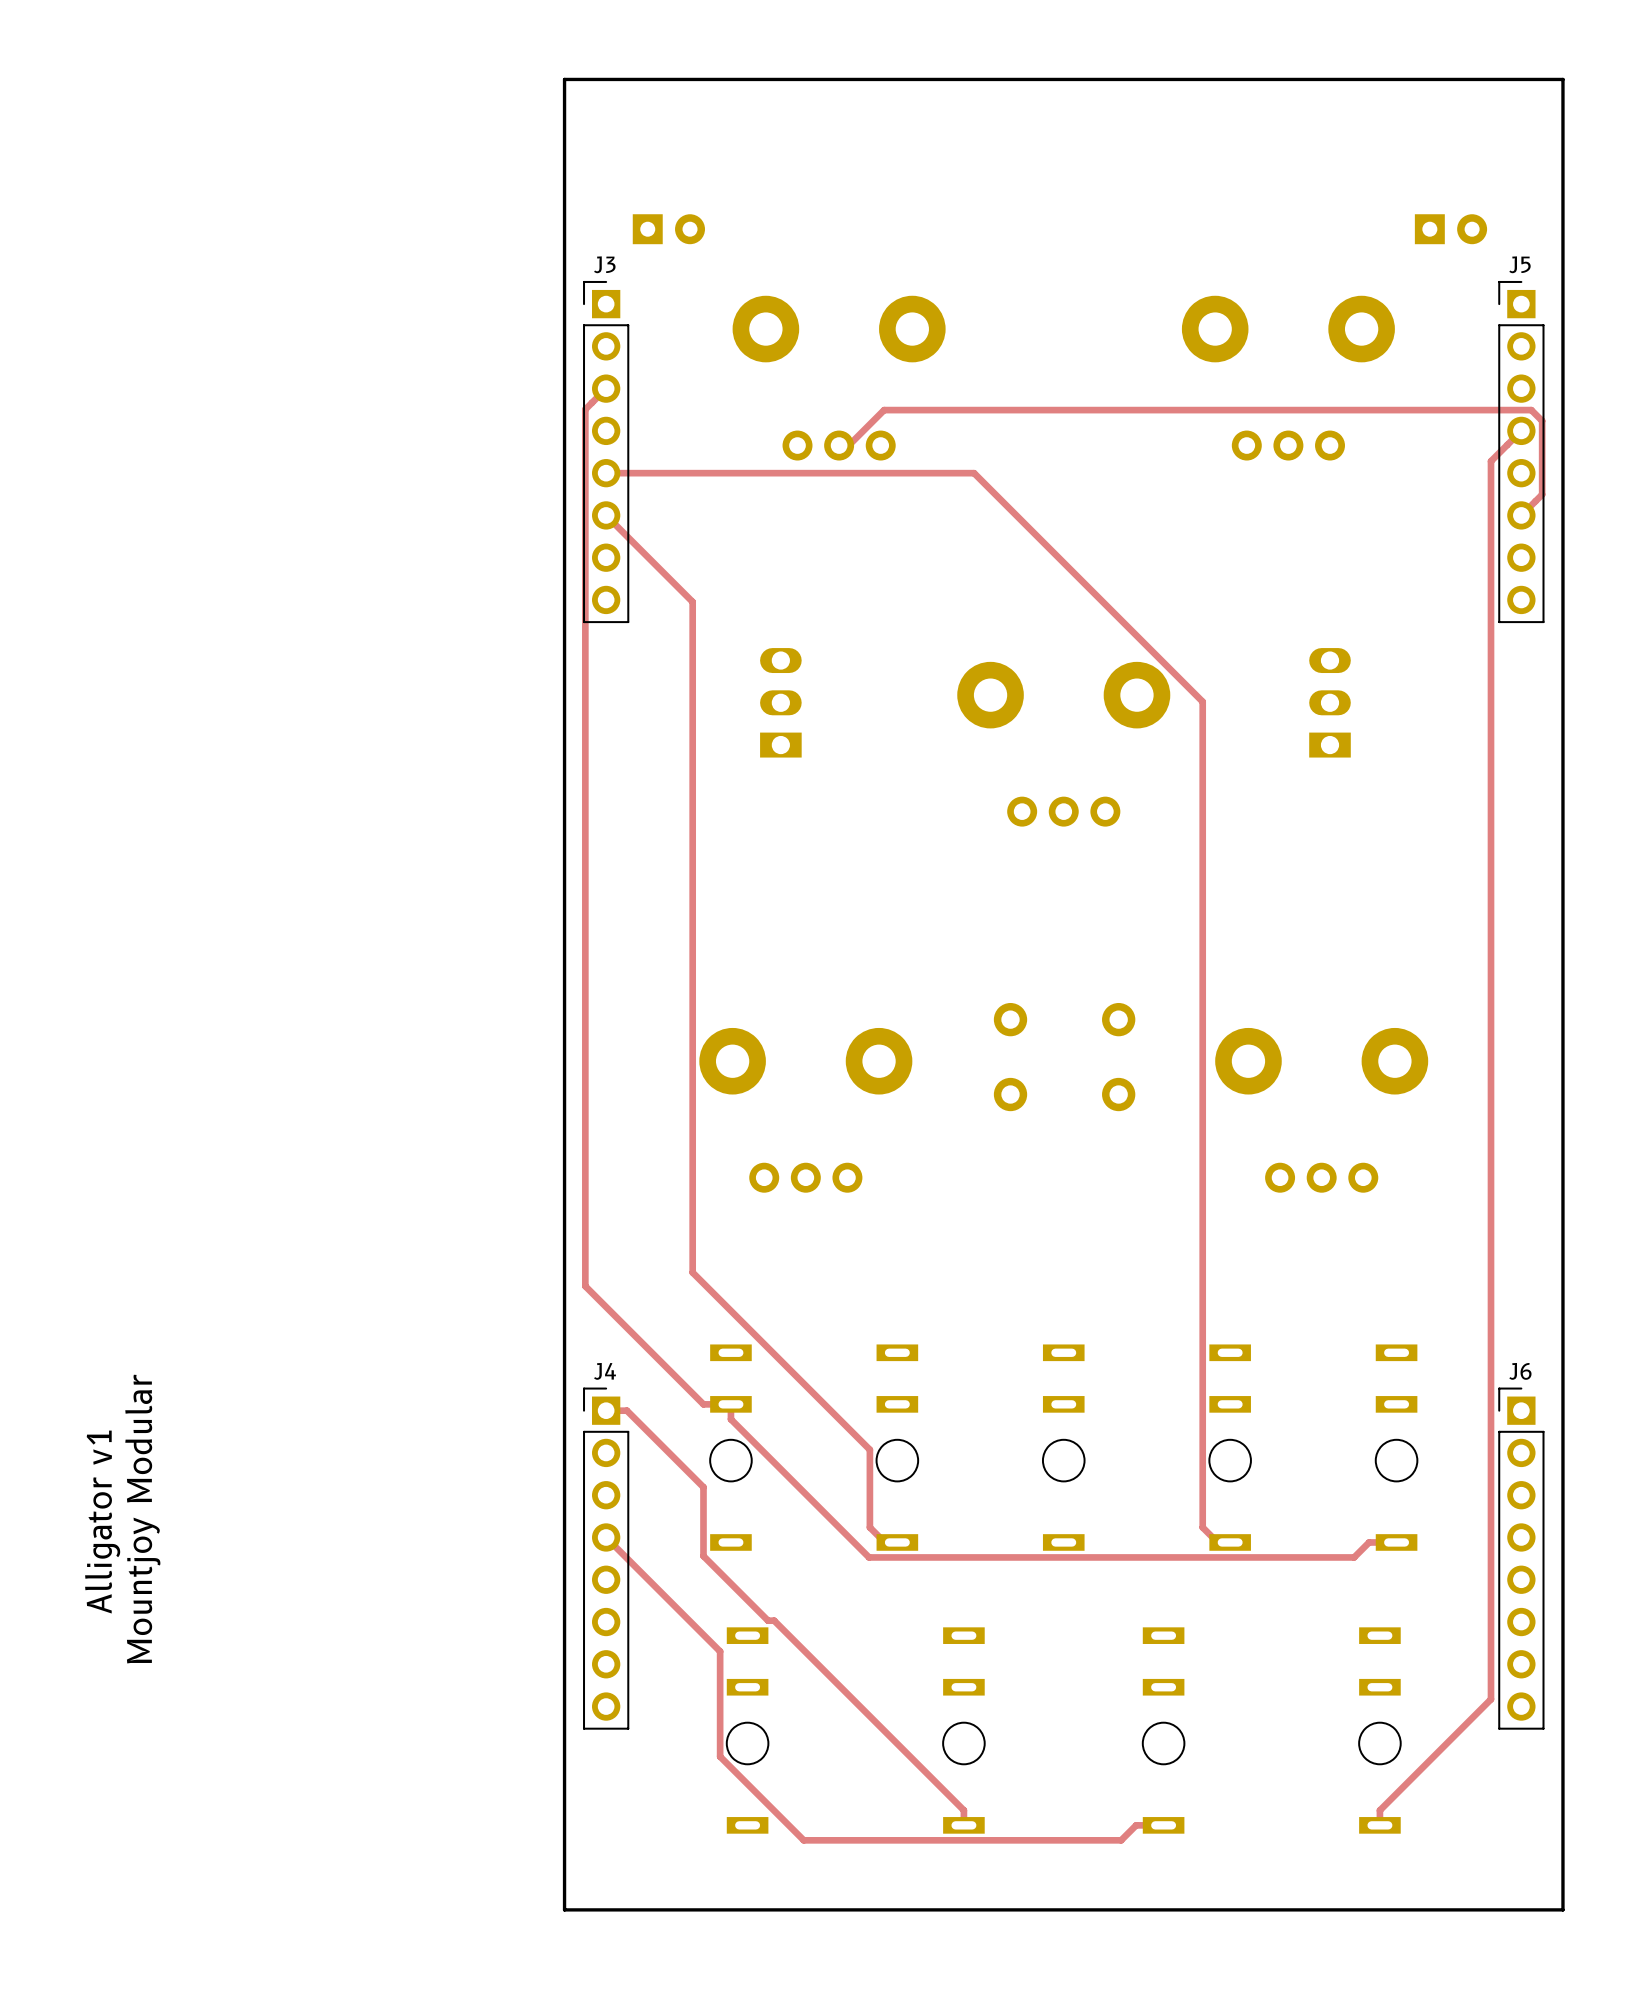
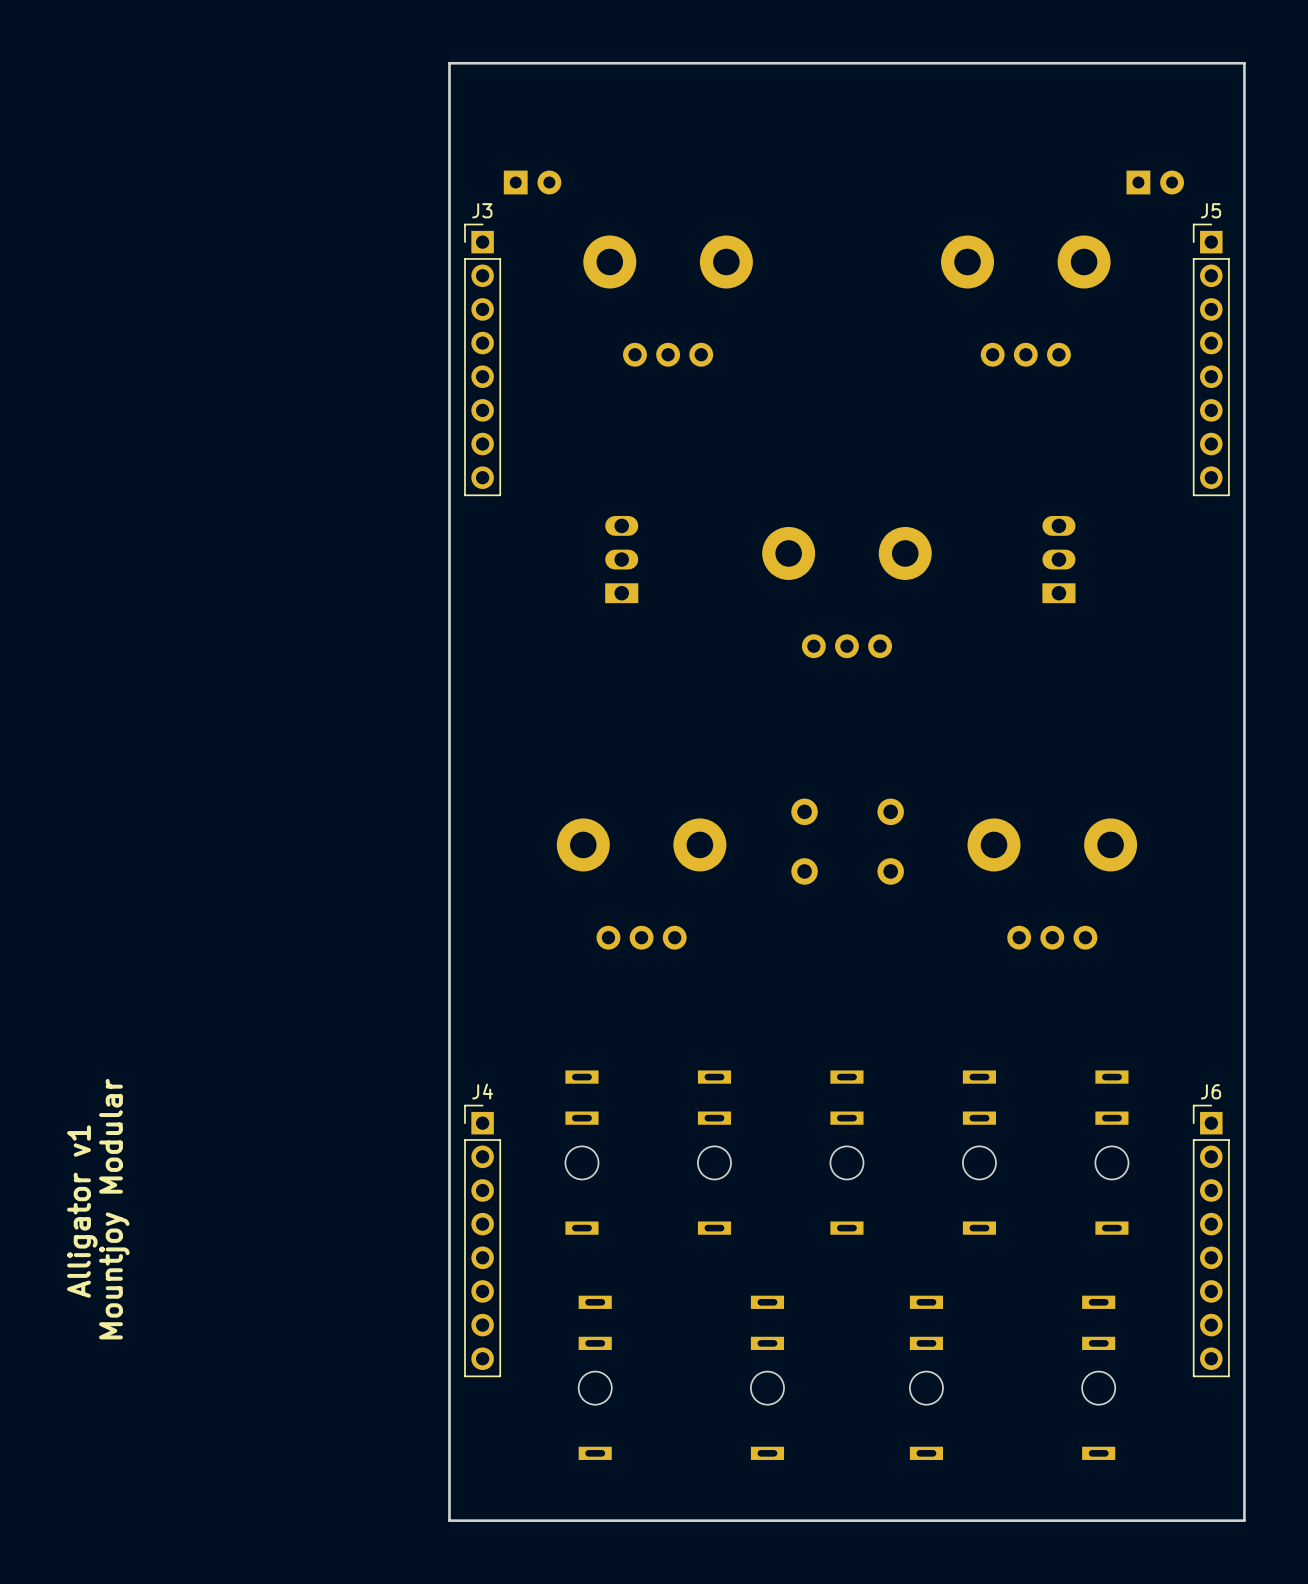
track: (606, 388) (585, 409) (585, 1286) (703, 1404) (730, 1404) (730, 1419) (869, 1557) (1354, 1557) (1369, 1542) (1396, 1542) -> none
track: (1521, 430) (1491, 461) (1491, 1699) (1379, 1810) (1379, 1825) -> none
track: (839, 445) (848, 445) (884, 410) (1531, 410) (1542, 420) (1542, 494) (1521, 515) -> none
track: (606, 473) (974, 473) (1202, 701) (1202, 1527) (1217, 1542) (1230, 1542) -> none
track: (606, 515) (692, 601) (692, 1272) (869, 1449) (869, 1527) (884, 1542) (897, 1542) -> none
track: (606, 1410) (626, 1410) (703, 1487) (703, 1556) (768, 1620) (774, 1620) (963, 1810) (963, 1825) -> none
track: (606, 1537) (720, 1651) (720, 1756) (803, 1840) (1121, 1840) (1136, 1825) (1163, 1825) -> none

